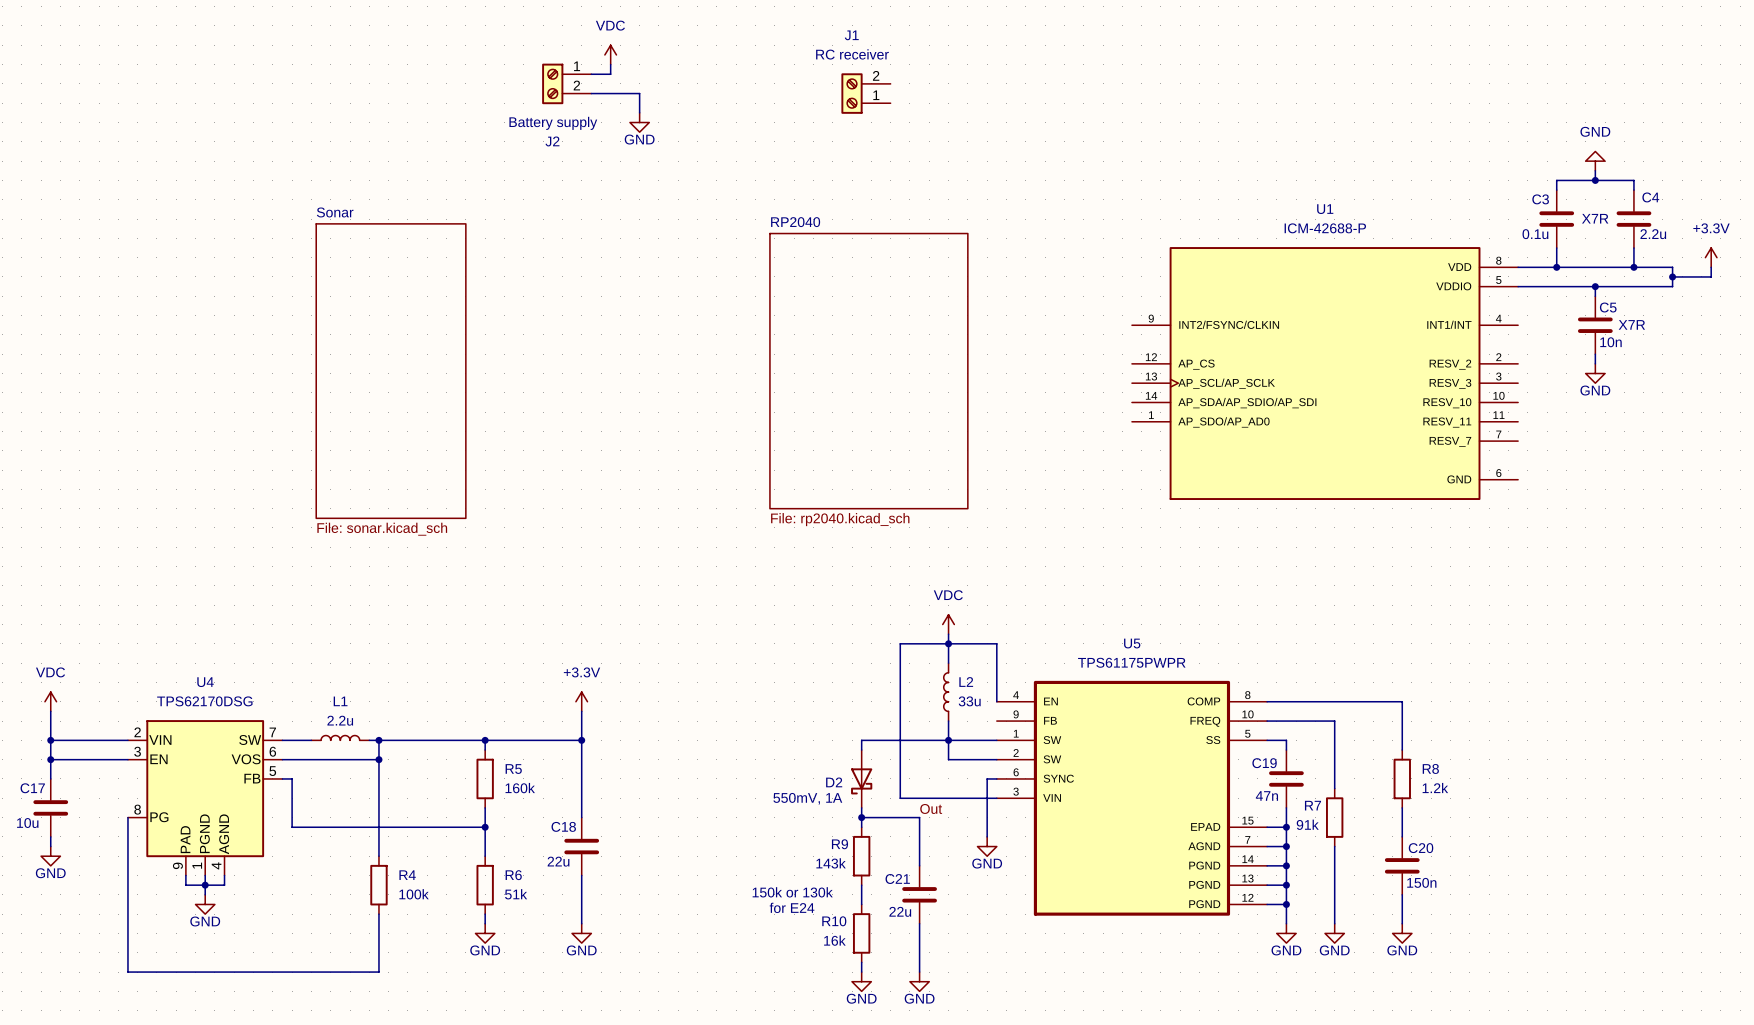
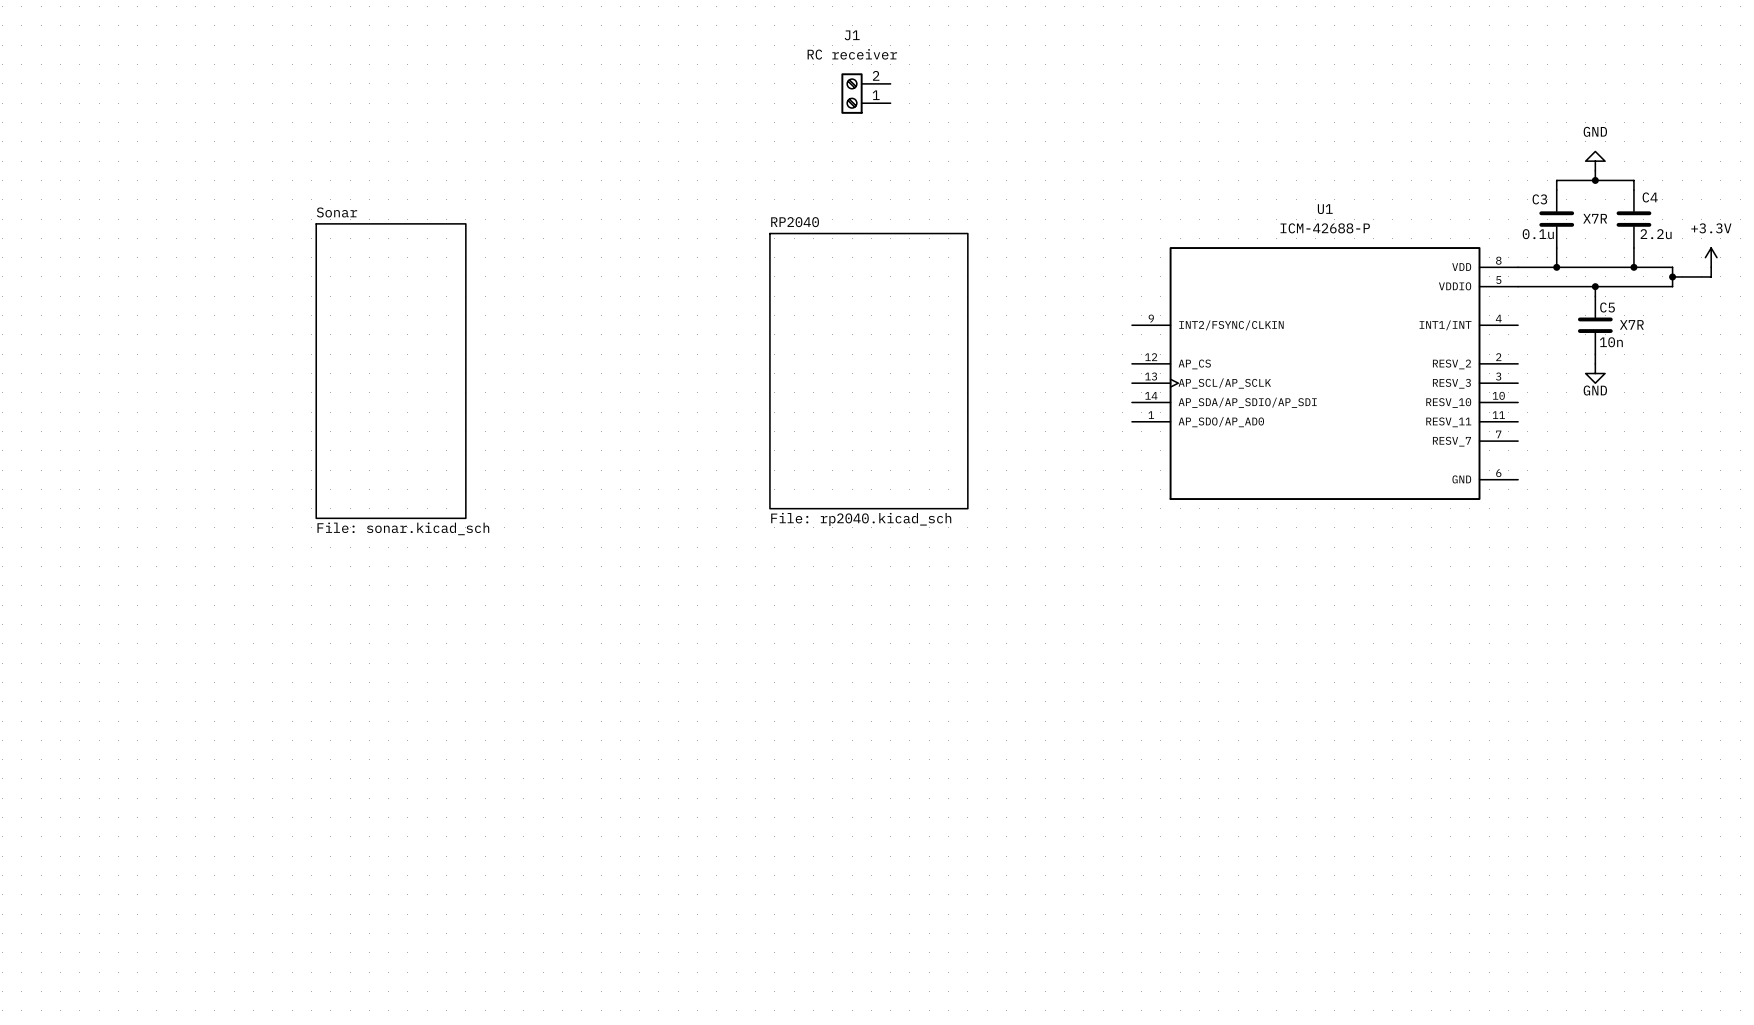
power symbol: VDC (610, 54) -> none
wire: (610, 64) (610, 74) (591, 74) -> none
J2: Battery supply (566, 83) -> none
wire: (591, 93) (639, 93) (639, 112) -> none
power symbol: GND (639, 122) -> none
power symbol: VDC (948, 624) -> none
wire: (948, 634) (948, 663) -> none
junction: (948, 643) -> none
L2: 33u (946, 692) -> none
power symbol: VDC (50, 701) -> none
power symbol: +3.3V (581, 701) -> none
wire: (996, 701) (996, 643) (900, 643) (900, 798) (996, 798) -> none
wire: (1267, 701) (1402, 701) (1402, 750) -> none
wire: (50, 711) (50, 778) -> none
wire: (581, 711) (581, 817) -> none
wire: (948, 721) (948, 759) (996, 759) -> none
wire: (1267, 721) (1334, 721) (1334, 788) -> none
L1: 2.2u (340, 737) -> none
wire: (50, 740) (127, 740) -> none
junction: (50, 740) -> none
wire: (282, 740) (311, 740) -> none
wire: (369, 740) (581, 740) -> none
wire: (378, 740) (378, 856) -> none
junction: (378, 740) -> none
wire: (485, 740) (485, 750) -> none
junction: (485, 740) -> none
junction: (581, 740) -> none
junction: (948, 740) -> none
wire: (996, 740) (861, 740) (861, 750) -> none
wire: (1267, 740) (1286, 740) (1286, 750) -> none
wire: (50, 759) (127, 759) -> none
junction: (50, 759) -> none
wire: (282, 759) (378, 759) -> none
junction: (378, 759) -> none
wire: (282, 778) (292, 778) (292, 827) (485, 827) -> none
R5: 160k (485, 778) -> none
D2: 550mV, 1A (861, 778) -> none
wire: (996, 778) (987, 778) (987, 836) -> none
C19: 47n (1286, 778) -> none
R8: 1.2k (1402, 778) -> none
U4: TPS62170DSG (205, 797) -> none
U5: TPS61175PWPR (1131, 798) -> none
C17: 10u (50, 807) -> none
wire: (485, 807) (485, 856) -> none
wire: (861, 807) (861, 827) -> none
wire: (1286, 807) (1286, 923) -> none
wire: (1402, 807) (1402, 836) -> none
label: Out (931, 808) -> none
wire: (127, 817) (127, 972) (378, 972) (378, 914) -> none
wire: (861, 817) (919, 817) (919, 865) -> none
junction: (861, 817) -> none
R7: 91k (1334, 817) -> none
junction: (485, 827) -> none
wire: (1267, 827) (1286, 827) -> none
junction: (1286, 827) -> none
wire: (50, 836) (50, 846) -> none
C18: 22u (581, 846) -> none
power symbol: GND (987, 846) -> none
wire: (1267, 846) (1286, 846) -> none
junction: (1286, 846) -> none
wire: (1334, 846) (1334, 923) -> none
power symbol: GND (50, 856) -> none
R9: 143k (861, 856) -> none
wire: (1267, 865) (1286, 865) -> none
junction: (1286, 865) -> none
C20: 150n (1402, 865) -> none
wire: (185, 875) (185, 885) (224, 885) (224, 875) -> none
wire: (205, 875) (205, 894) -> none
wire: (581, 875) (581, 923) -> none
junction: (205, 885) -> none
R4: 100k (378, 885) -> none
R6: 51k (485, 885) -> none
wire: (861, 885) (861, 904) -> none
wire: (1267, 885) (1286, 885) -> none
junction: (1286, 885) -> none
text: 150k or 130k (792, 892) -> none
C21: 22u (919, 894) -> none
wire: (1402, 894) (1402, 923) -> none
power symbol: GND (205, 904) -> none
wire: (1267, 904) (1286, 904) -> none
junction: (1286, 904) -> none
text: for E24 (792, 907) -> none
wire: (485, 914) (485, 923) -> none
wire: (919, 923) (919, 972) -> none
power symbol: GND (485, 933) -> none
power symbol: GND (581, 933) -> none
R10: 16k (861, 933) -> none
power symbol: GND (1286, 933) -> none
power symbol: GND (1334, 933) -> none
power symbol: GND (1402, 933) -> none
wire: (861, 962) (861, 972) -> none
power symbol: GND (861, 981) -> none
power symbol: GND (919, 981) -> none

